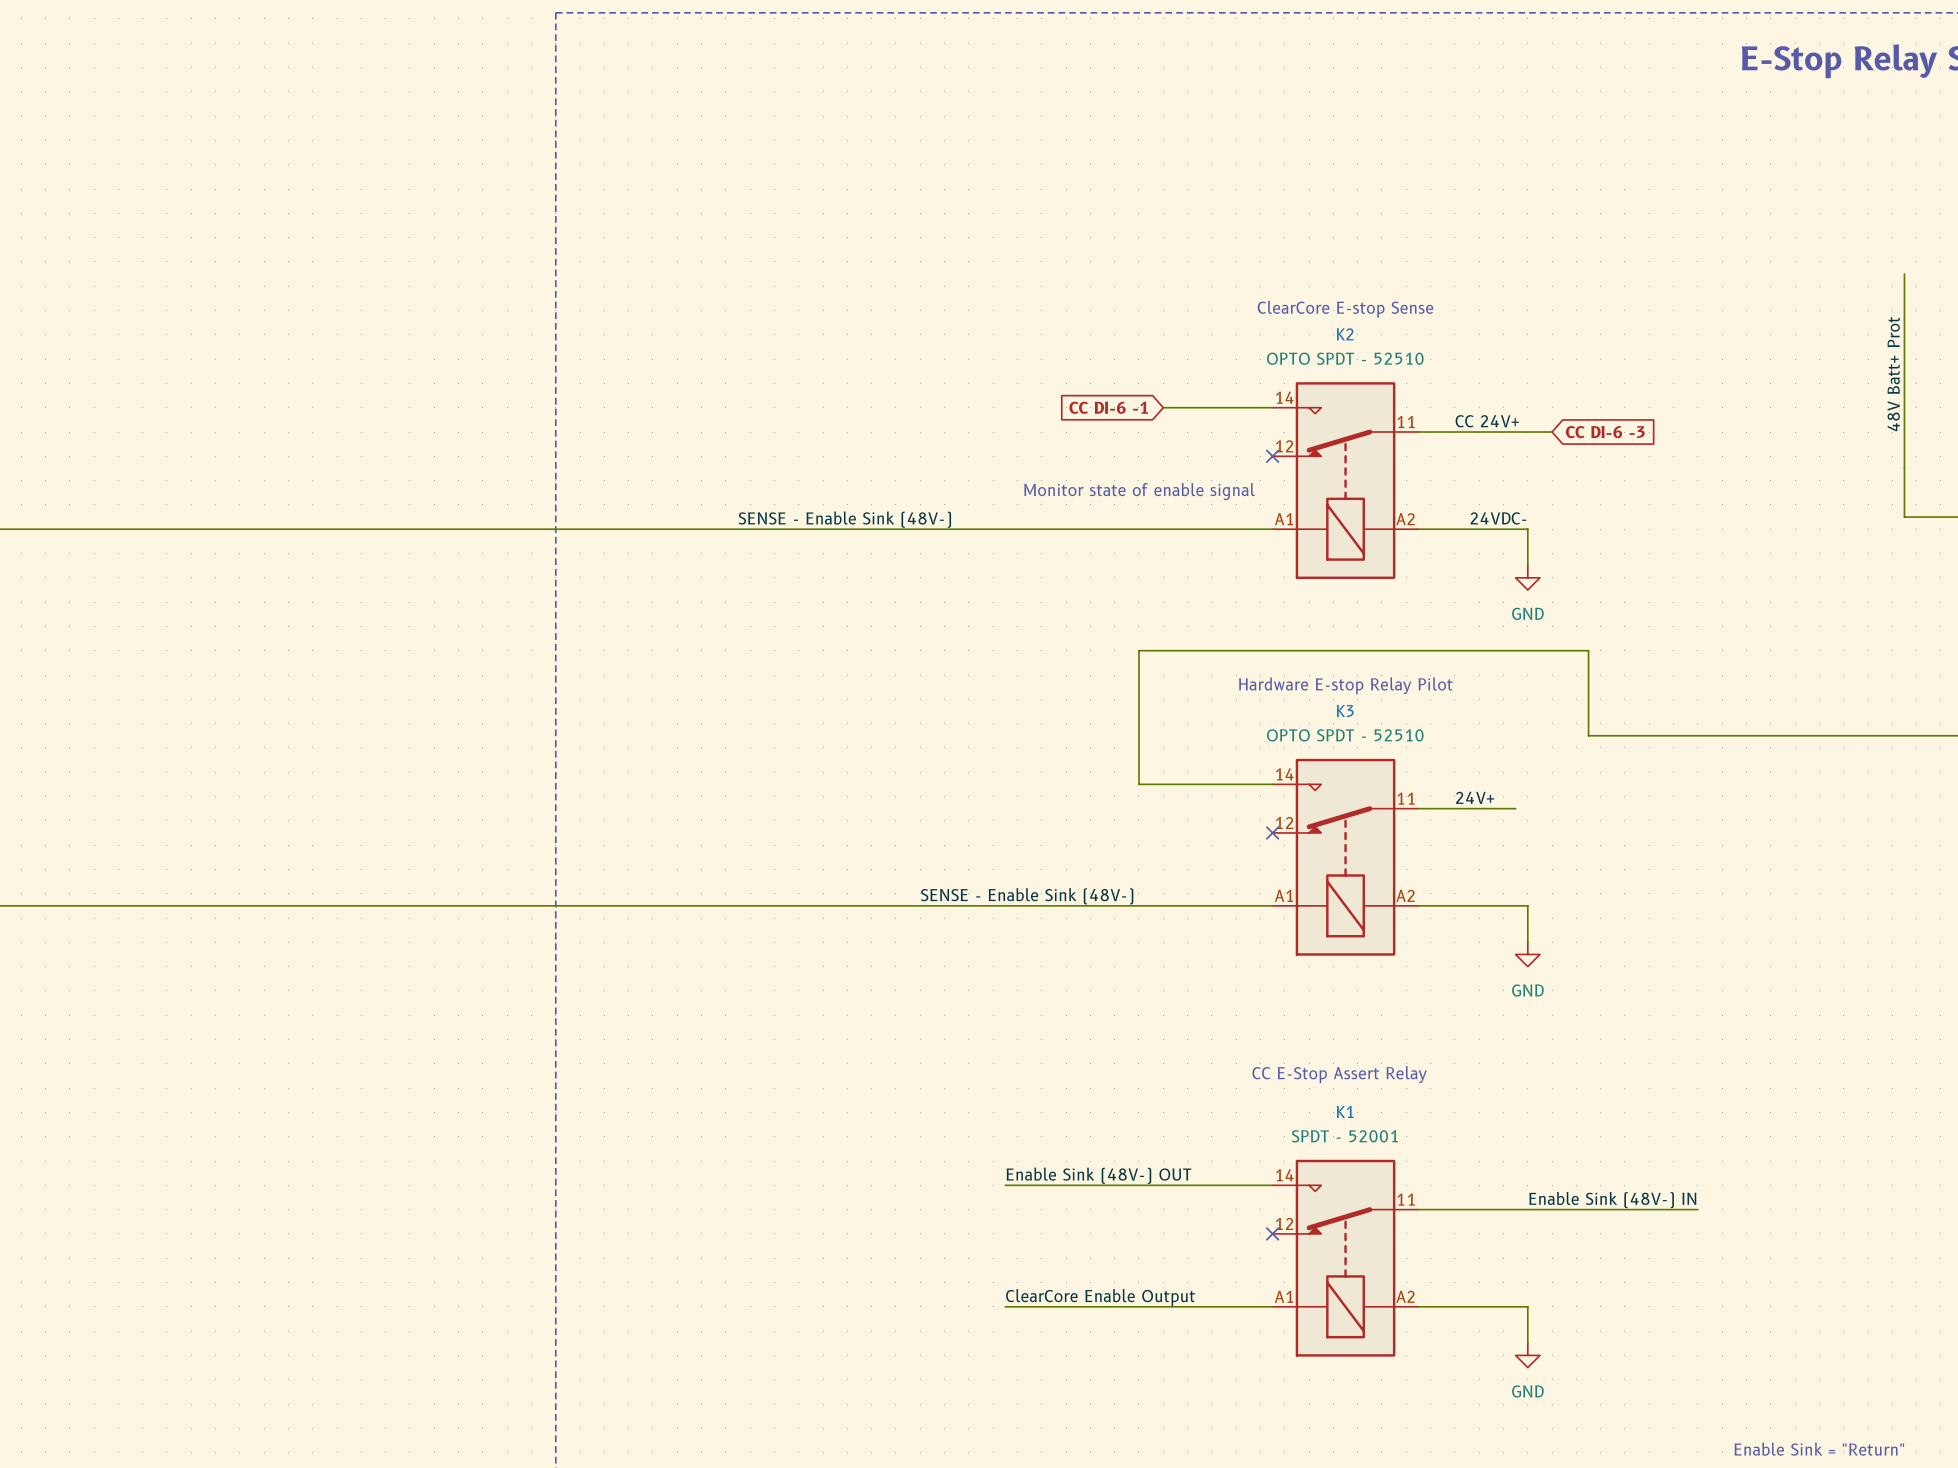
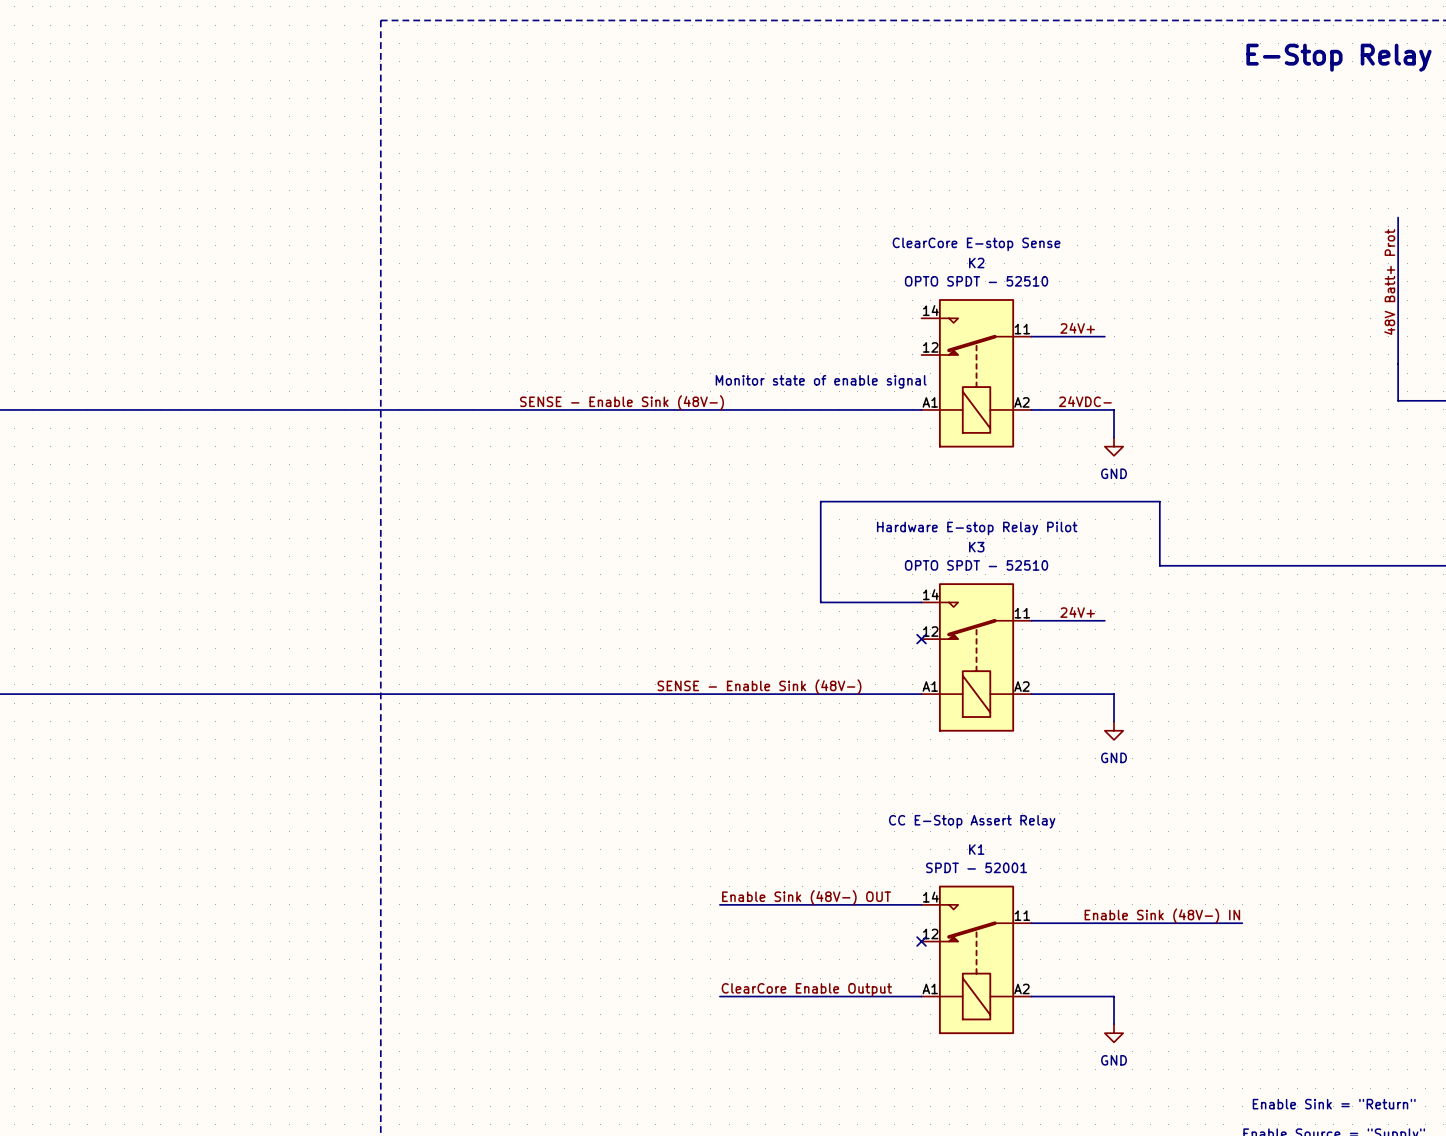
global label: CC DI-6 -1 (1108, 407) -> none
wire: (1163, 407) (1272, 407) -> none
label: CC 24V+ (1487, 421) -> 24V+ (1077, 328)
wire: (1515, 432) (1552, 432) -> none
global label: CC DI-6 -3 (1605, 432) -> none
no-connect mark: (1272, 456) -> none

